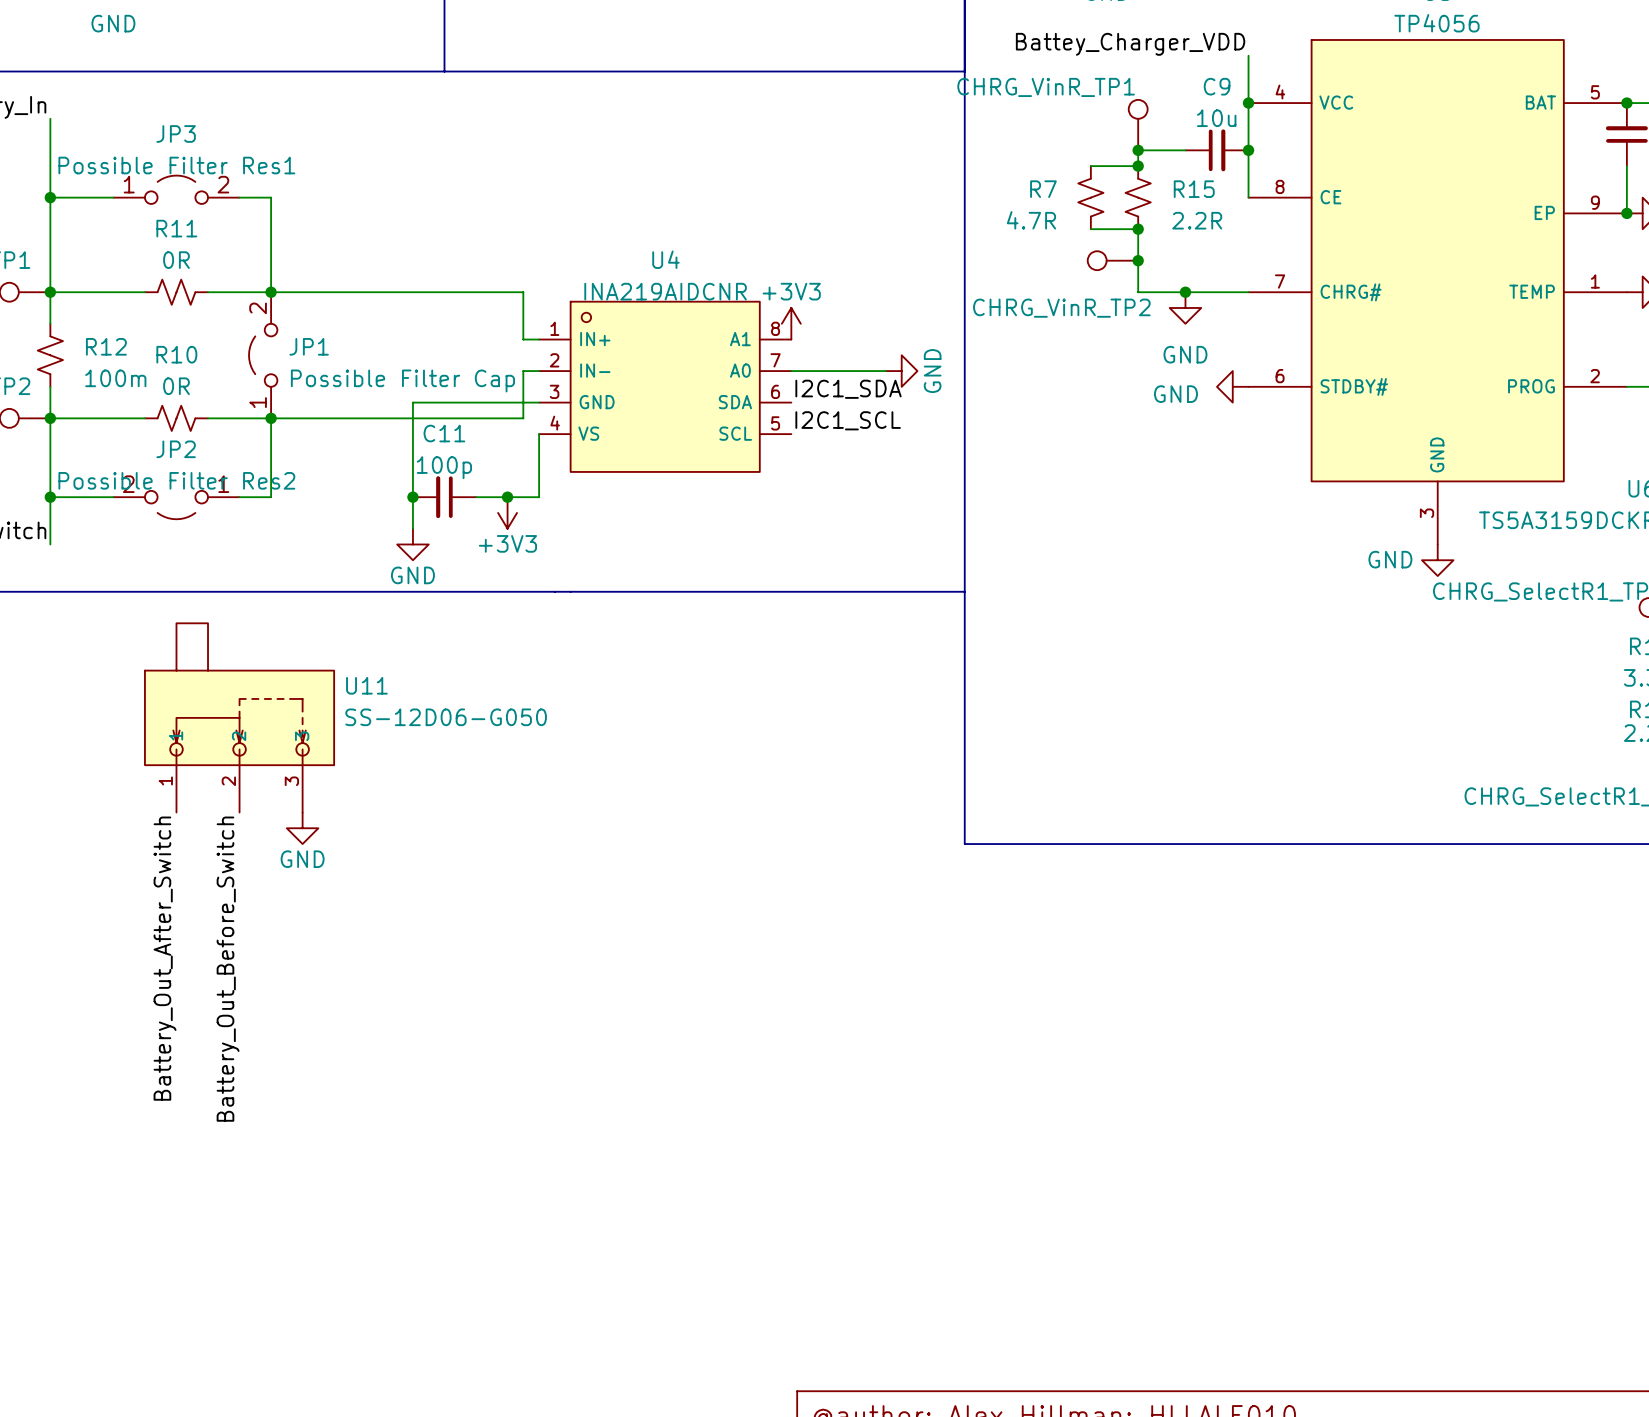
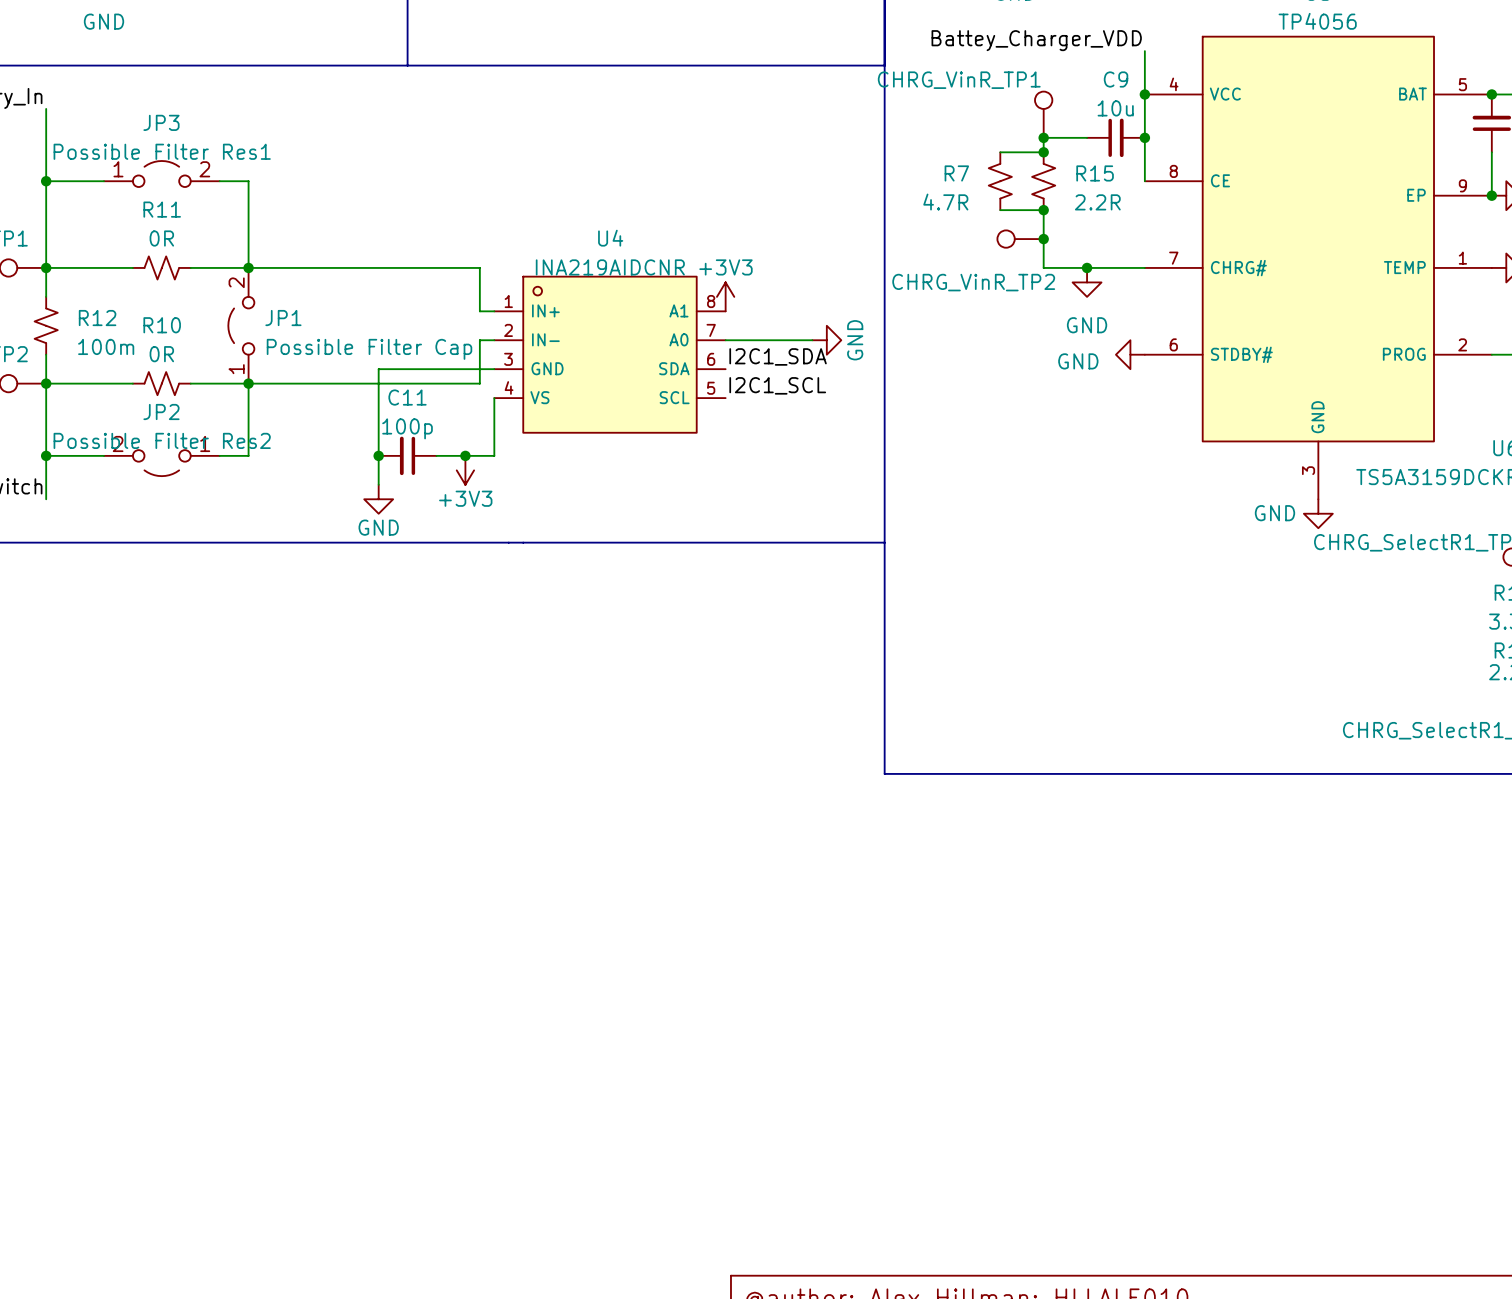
U11: SS-12D06-G050 (239, 717) -> none
power symbol: GND (302, 828) -> none
label: Battery_Out_After_Switch (165, 958) -> none
label: Battery_Out_Before_Switch (228, 969) -> none

